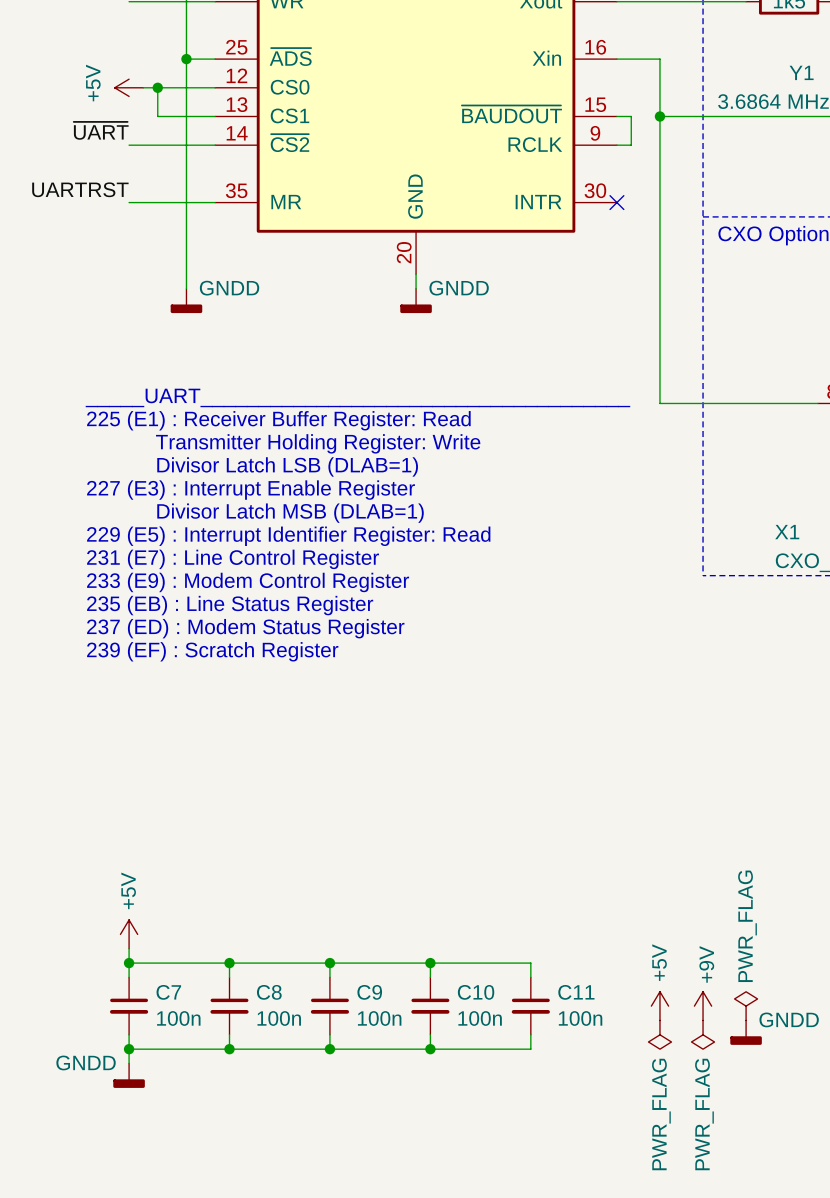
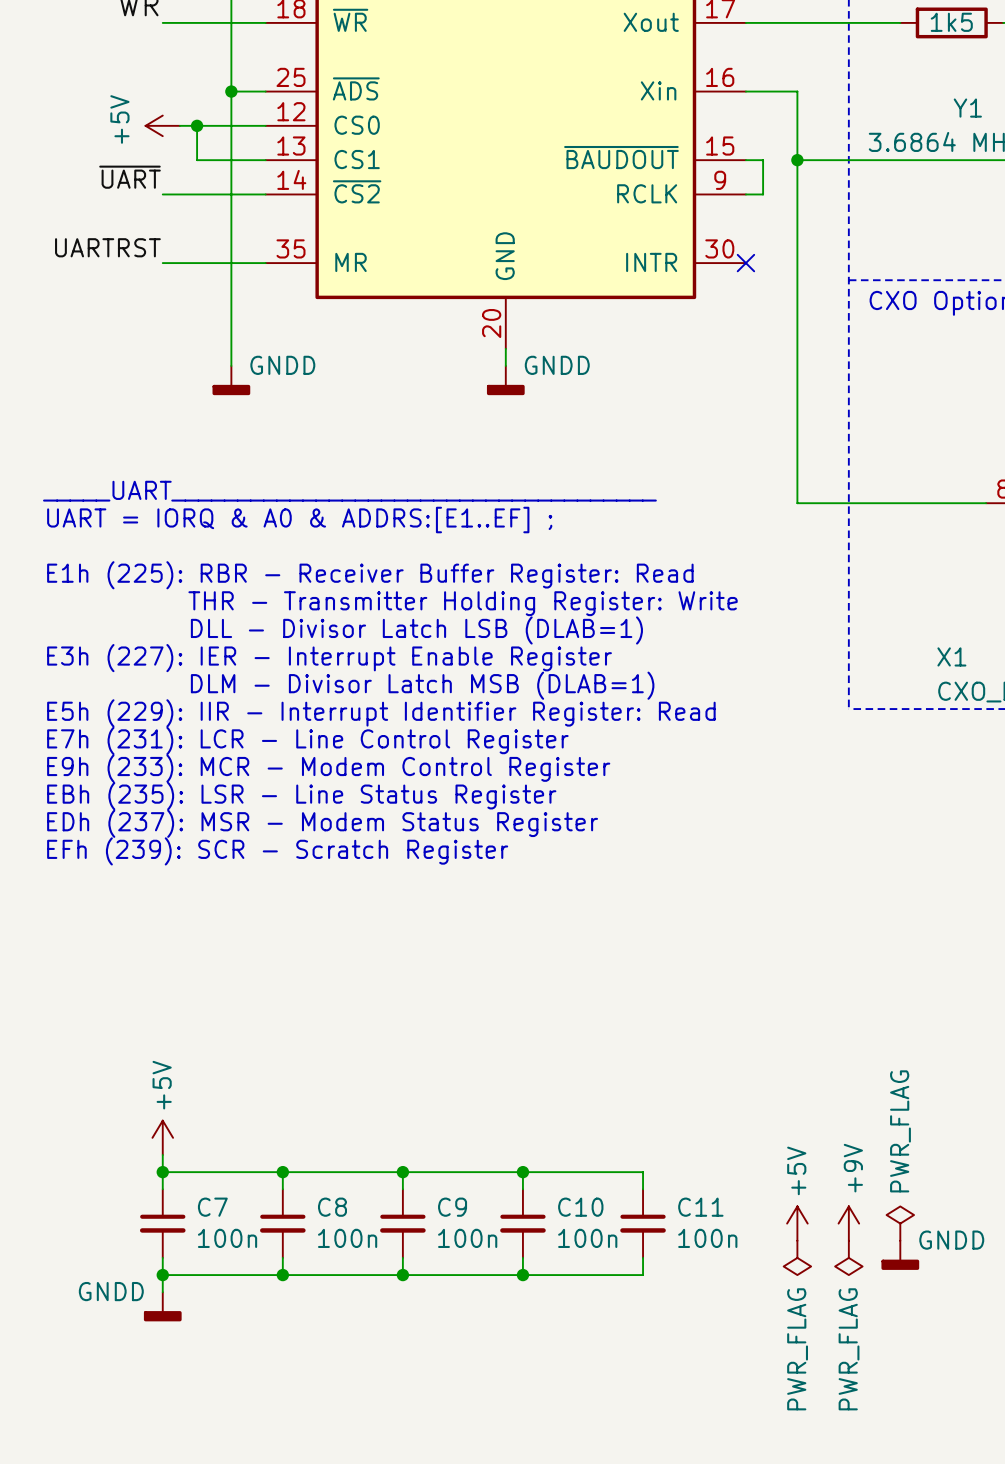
text position: _____UART_____________________________________ (357, 397) -> _____UART_____________________________________ (349, 491)
text: none -> UART = IORQ & A0 & ADDRS:[E1..EF] ; (299, 520)
text: 225 (E1) : Receiver Buffer Register: Read (278, 420) -> none
text: Transmitter Holding Register: Write (318, 443) -> none
text: none -> E1h (225): RBR - Receiver Buffer Register: Read (370, 575)
text: Divisor Latch LSB (DLAB=1) (287, 466) -> none
text: none -> THR - Transmitter Holding Register: Write (463, 603)
text: 227 (E3) : Interrupt Enable Register (251, 490) -> none
text: Divisor Latch MSB (DLAB=1) (290, 513) -> DLL - Divisor Latch LSB (DLAB=1) (416, 630)
text: none -> E3h (227): IER - Interrupt Enable Register (329, 658)
text: 229 (E5) : Interrupt Identifier Register: Read (288, 536) -> none
text: none -> DLM - Divisor Latch MSB (DLAB=1) (422, 685)
text: 231 (E7) : Line Control Register (233, 559) -> none
text: none -> E5h (229): IIR - Interrupt Identifier Register: Read (381, 713)
text: 233 (E9) : Modem Control Register (248, 582) -> E7h (231): LCR - Line Control Register (307, 740)
text: 235 (EB) : Line Status Register (230, 605) -> none
text: none -> E9h (233): MCR - Modem Control Register (328, 768)
text: 237 (ED) : Modem Status Register (245, 628) -> EBh (235): LSR - Line Status Register (301, 796)
text: 239 (EF) : Scratch Register (212, 651) -> none
text: none -> EDh (237): MSR - Modem Status Register (322, 823)
text: none -> EFh (239): SCR - Scratch Register (277, 851)

